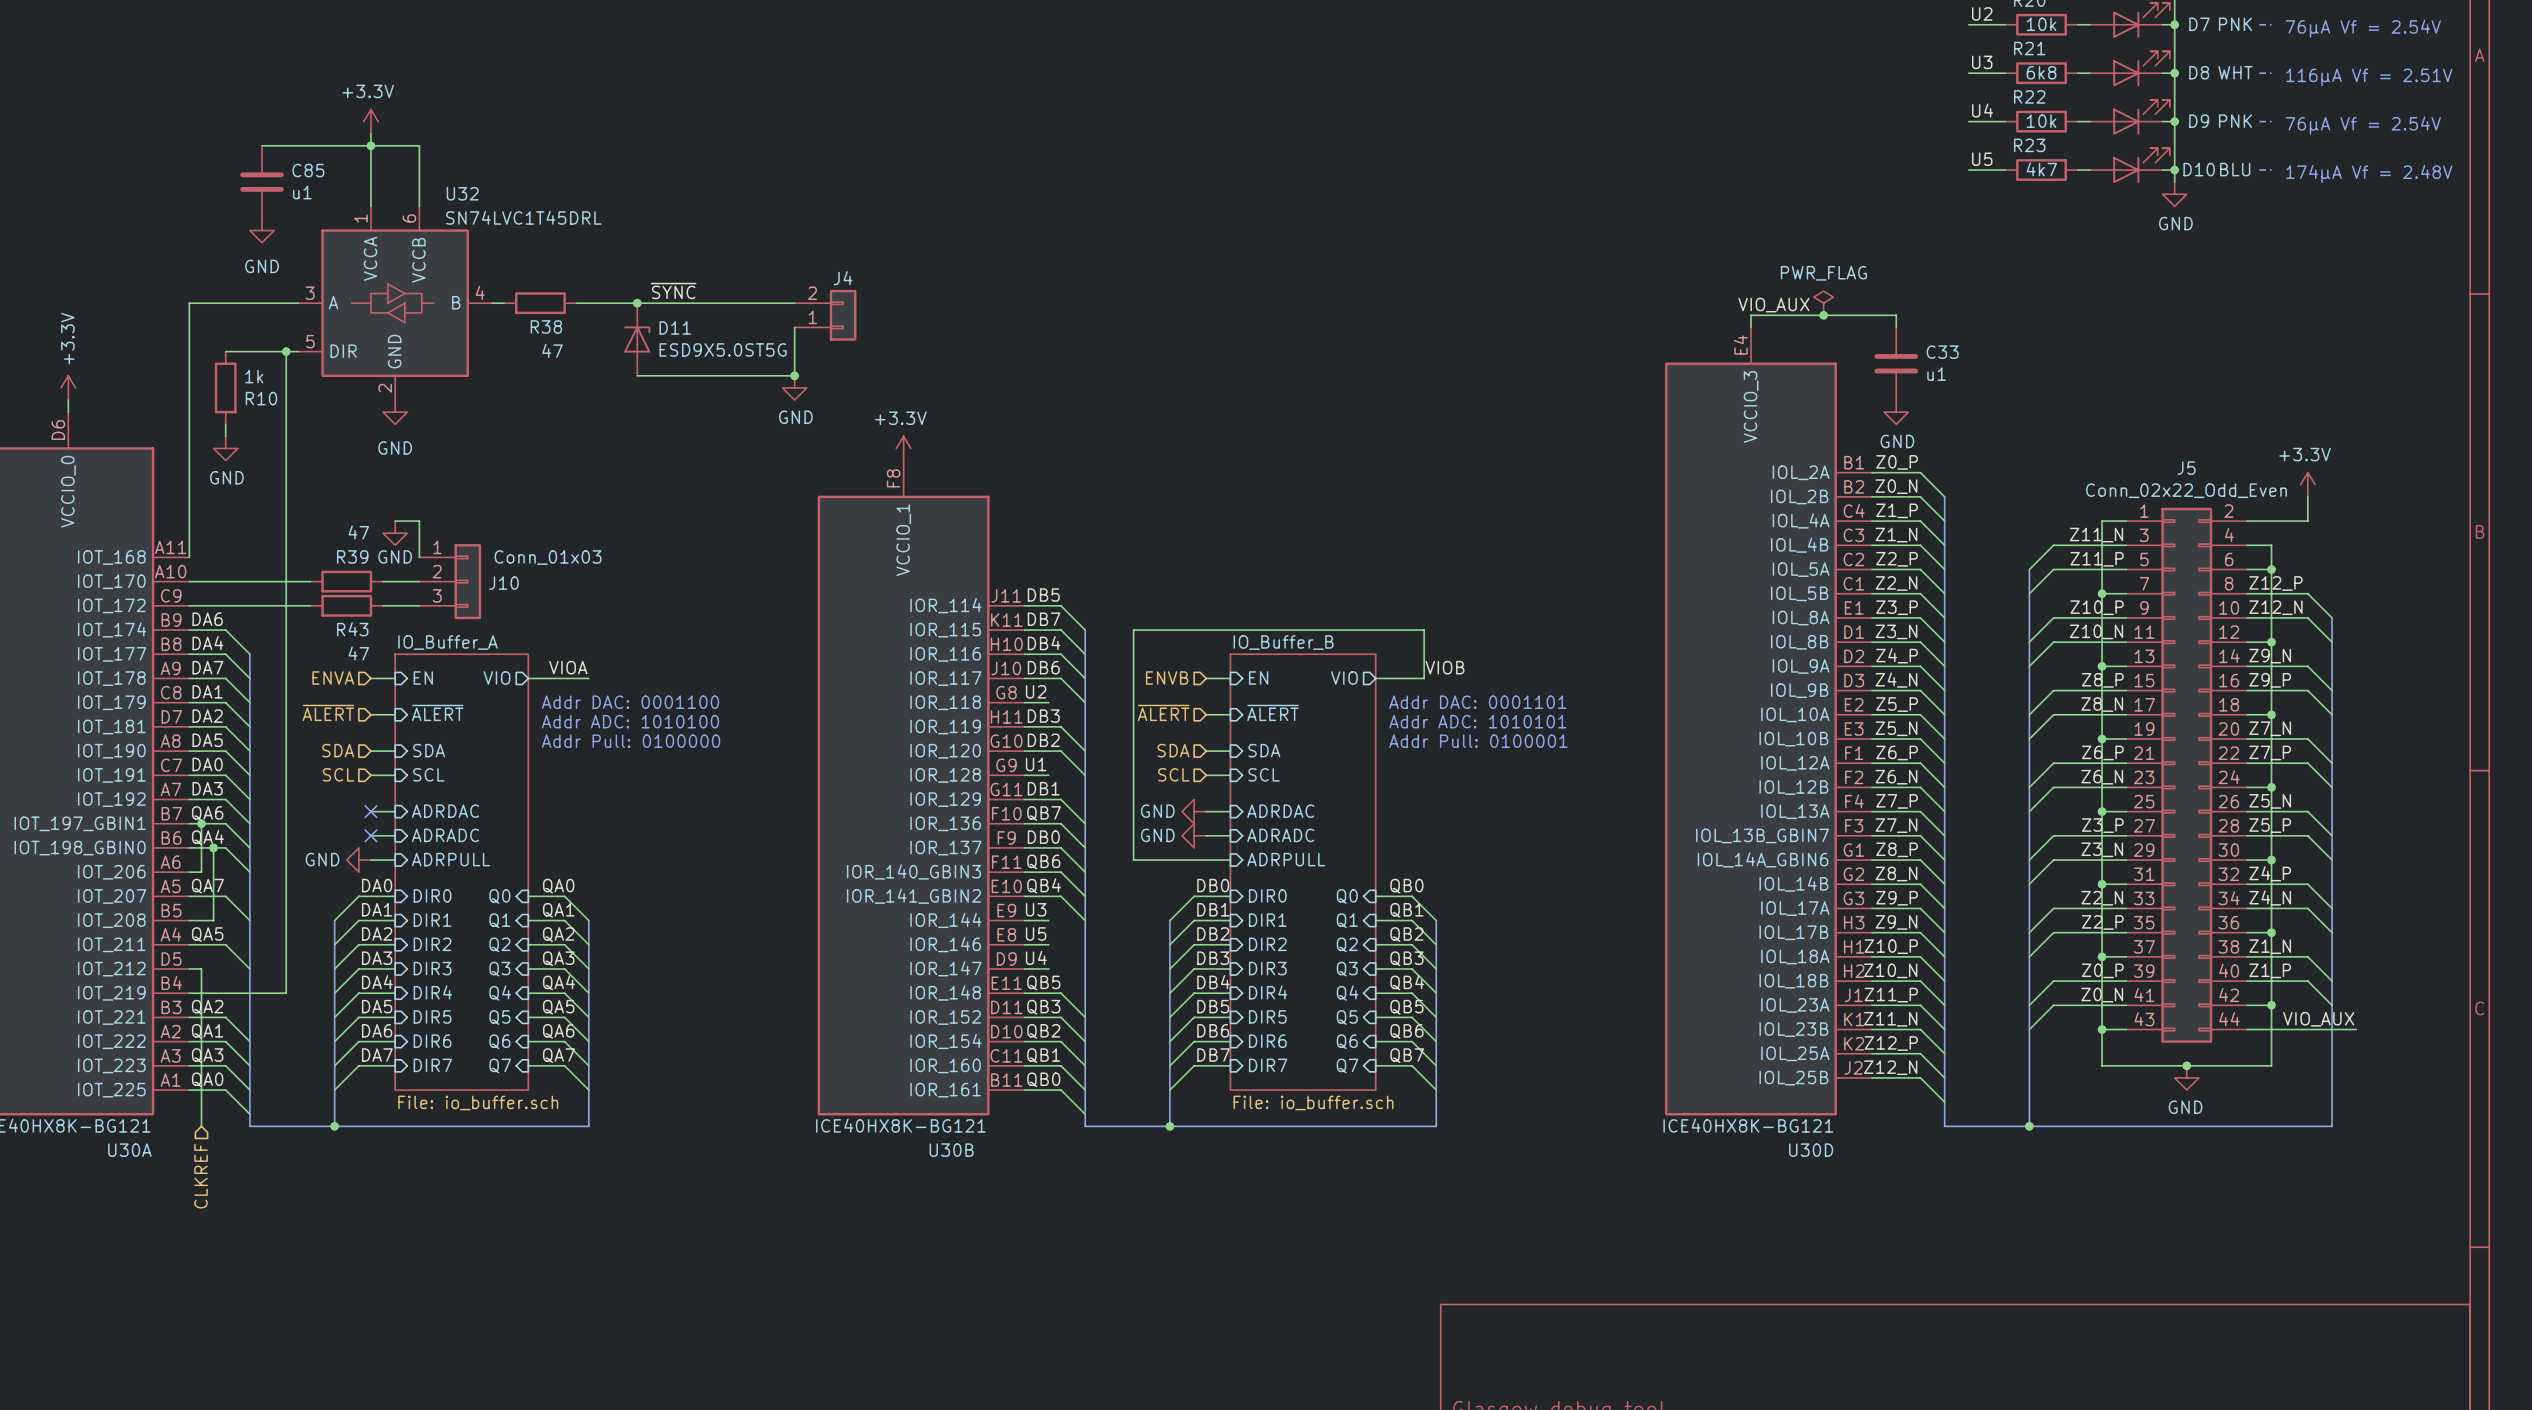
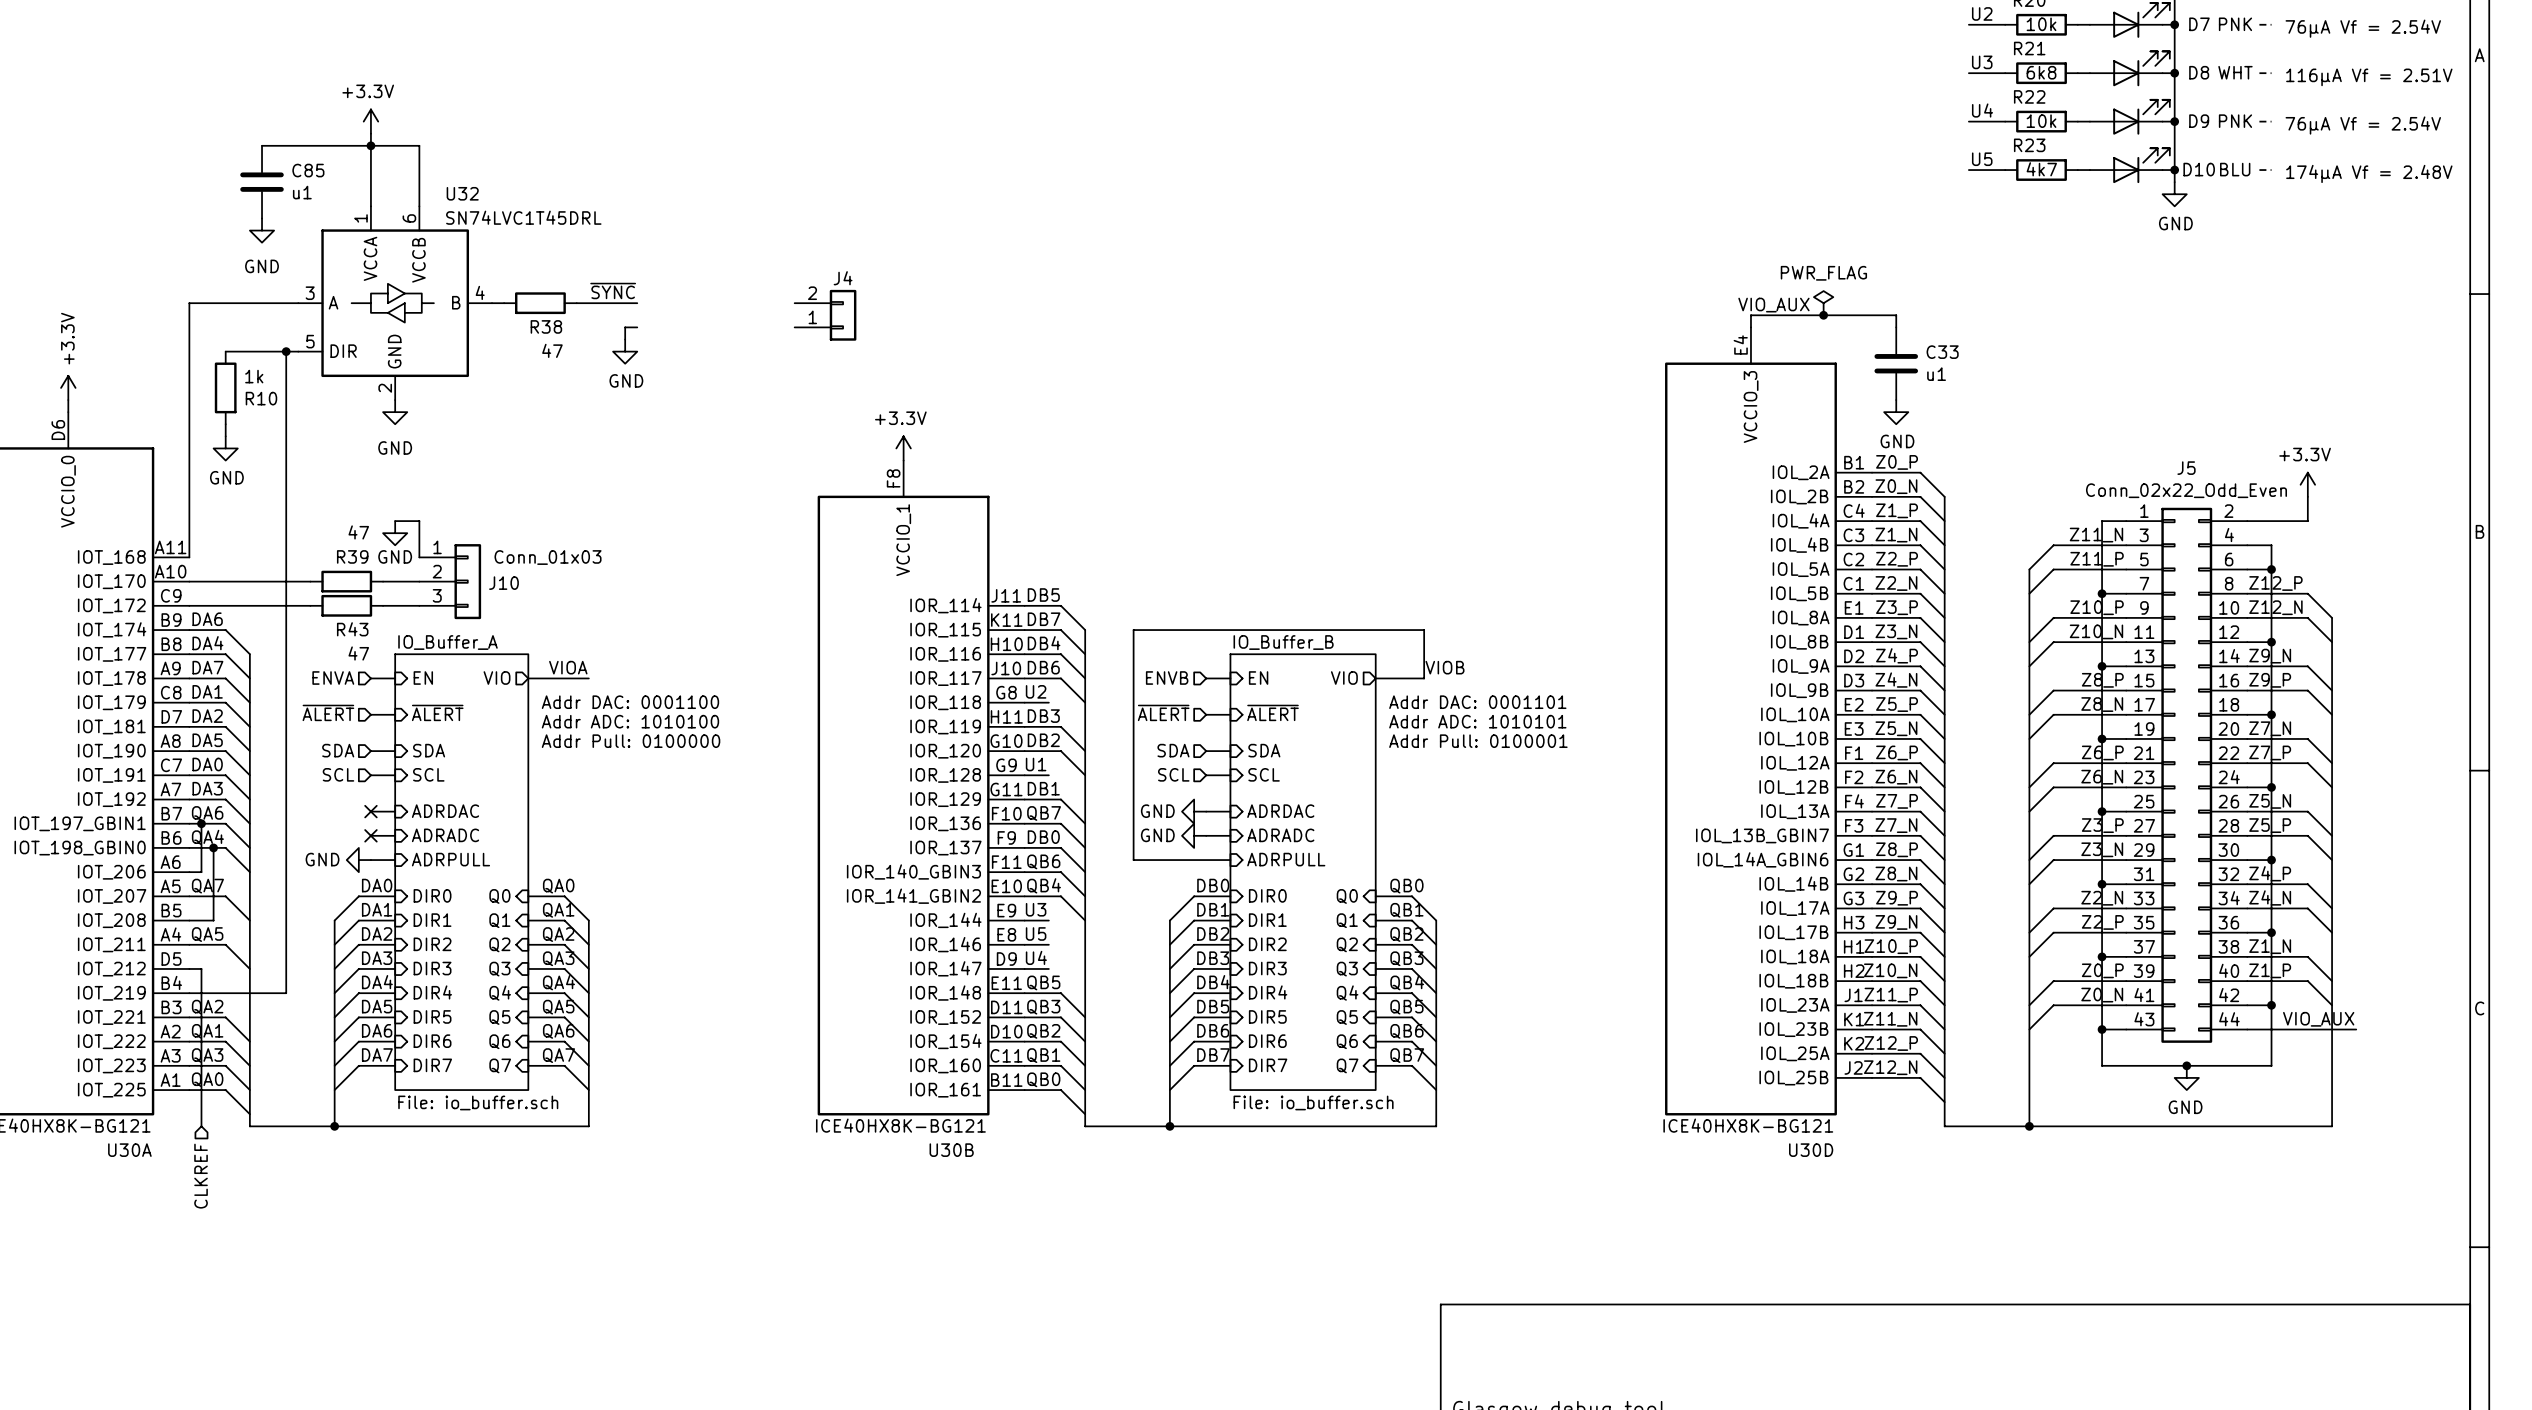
label position: ~{SYNC} (673, 290) -> ~{SYNC} (613, 290)
wire: (637, 303) (794, 303) -> none
junction: (637, 303) -> none
wire: none -> (637, 327) (625, 327) (625, 339)
wire: (794, 327) (794, 375) (637, 375) -> none
D11: ESD9X5.0ST5G (637, 339) -> none
junction: (794, 375) -> none
power symbol position: GND (794, 387) -> GND (625, 351)

